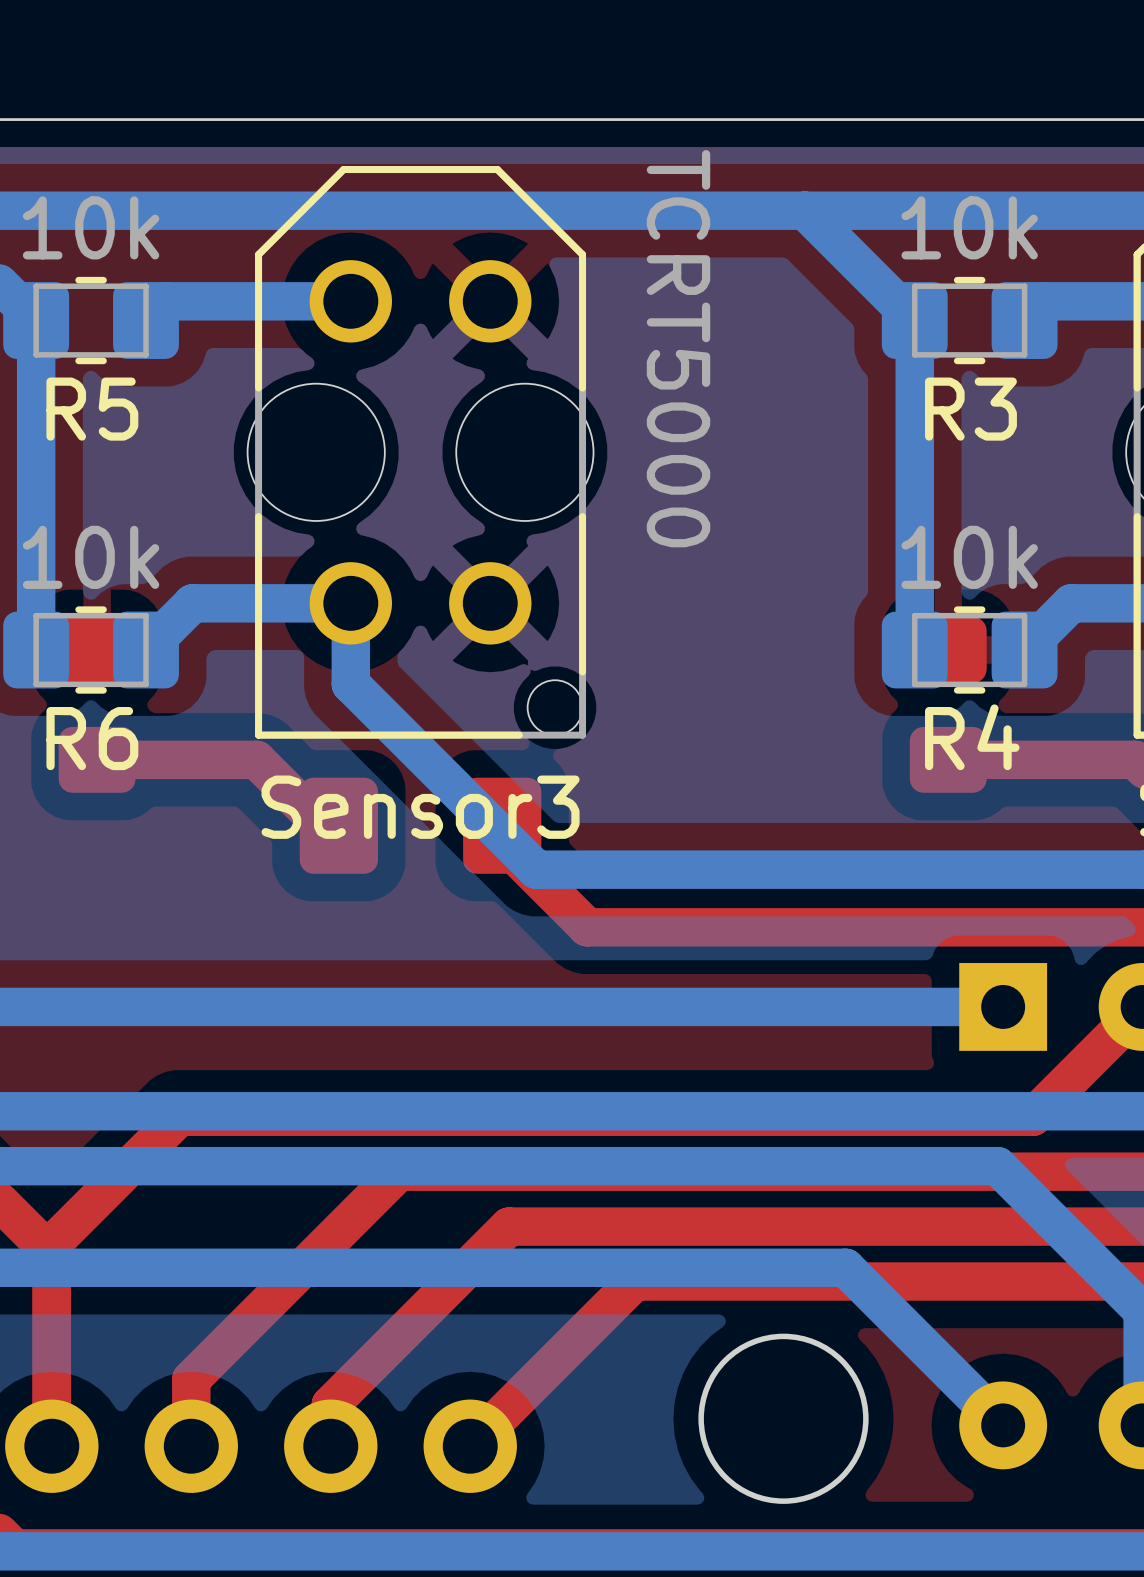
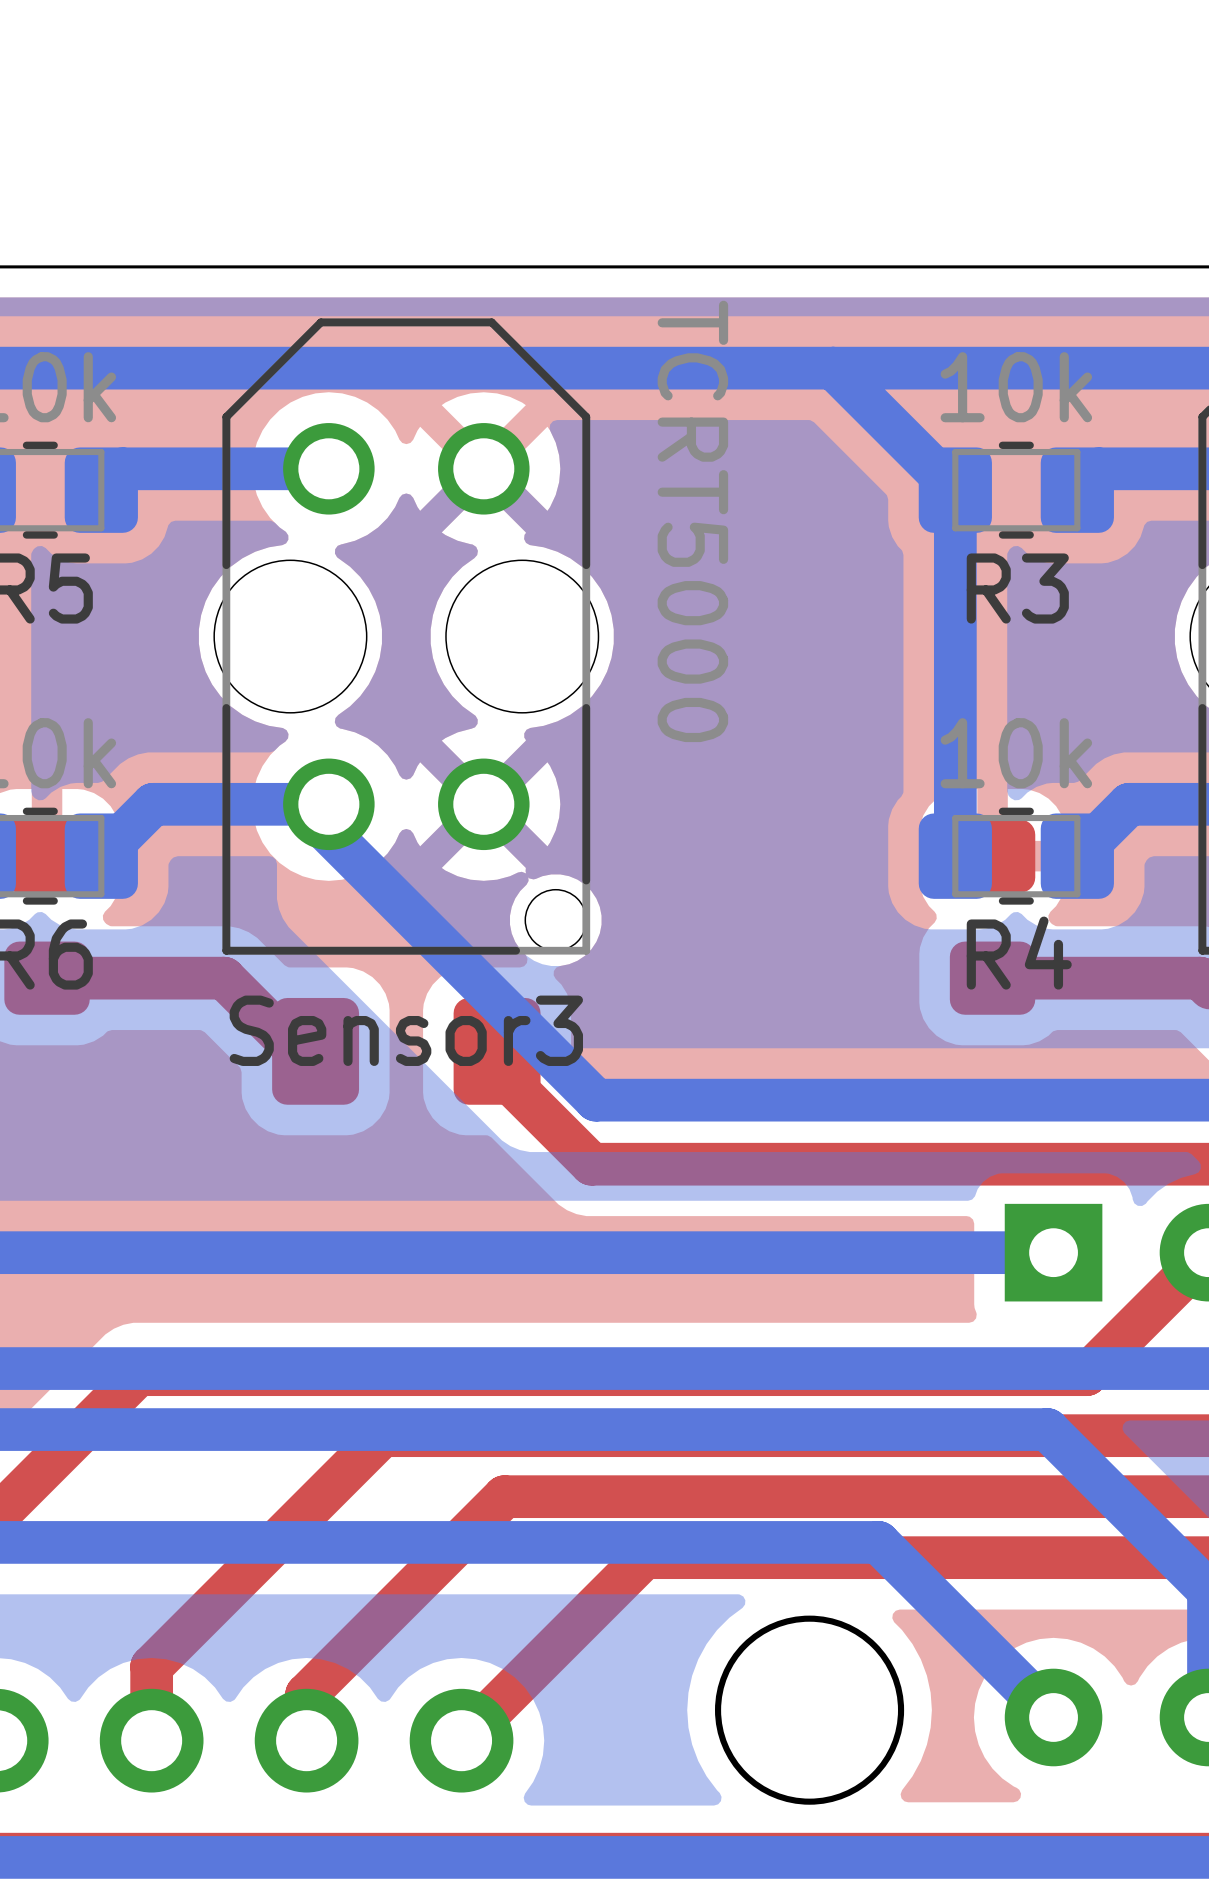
bottom track: (344, 622) (350, 622) (350, 684) (536, 869) (591, 869) -> (322, 825) (596, 1100)

